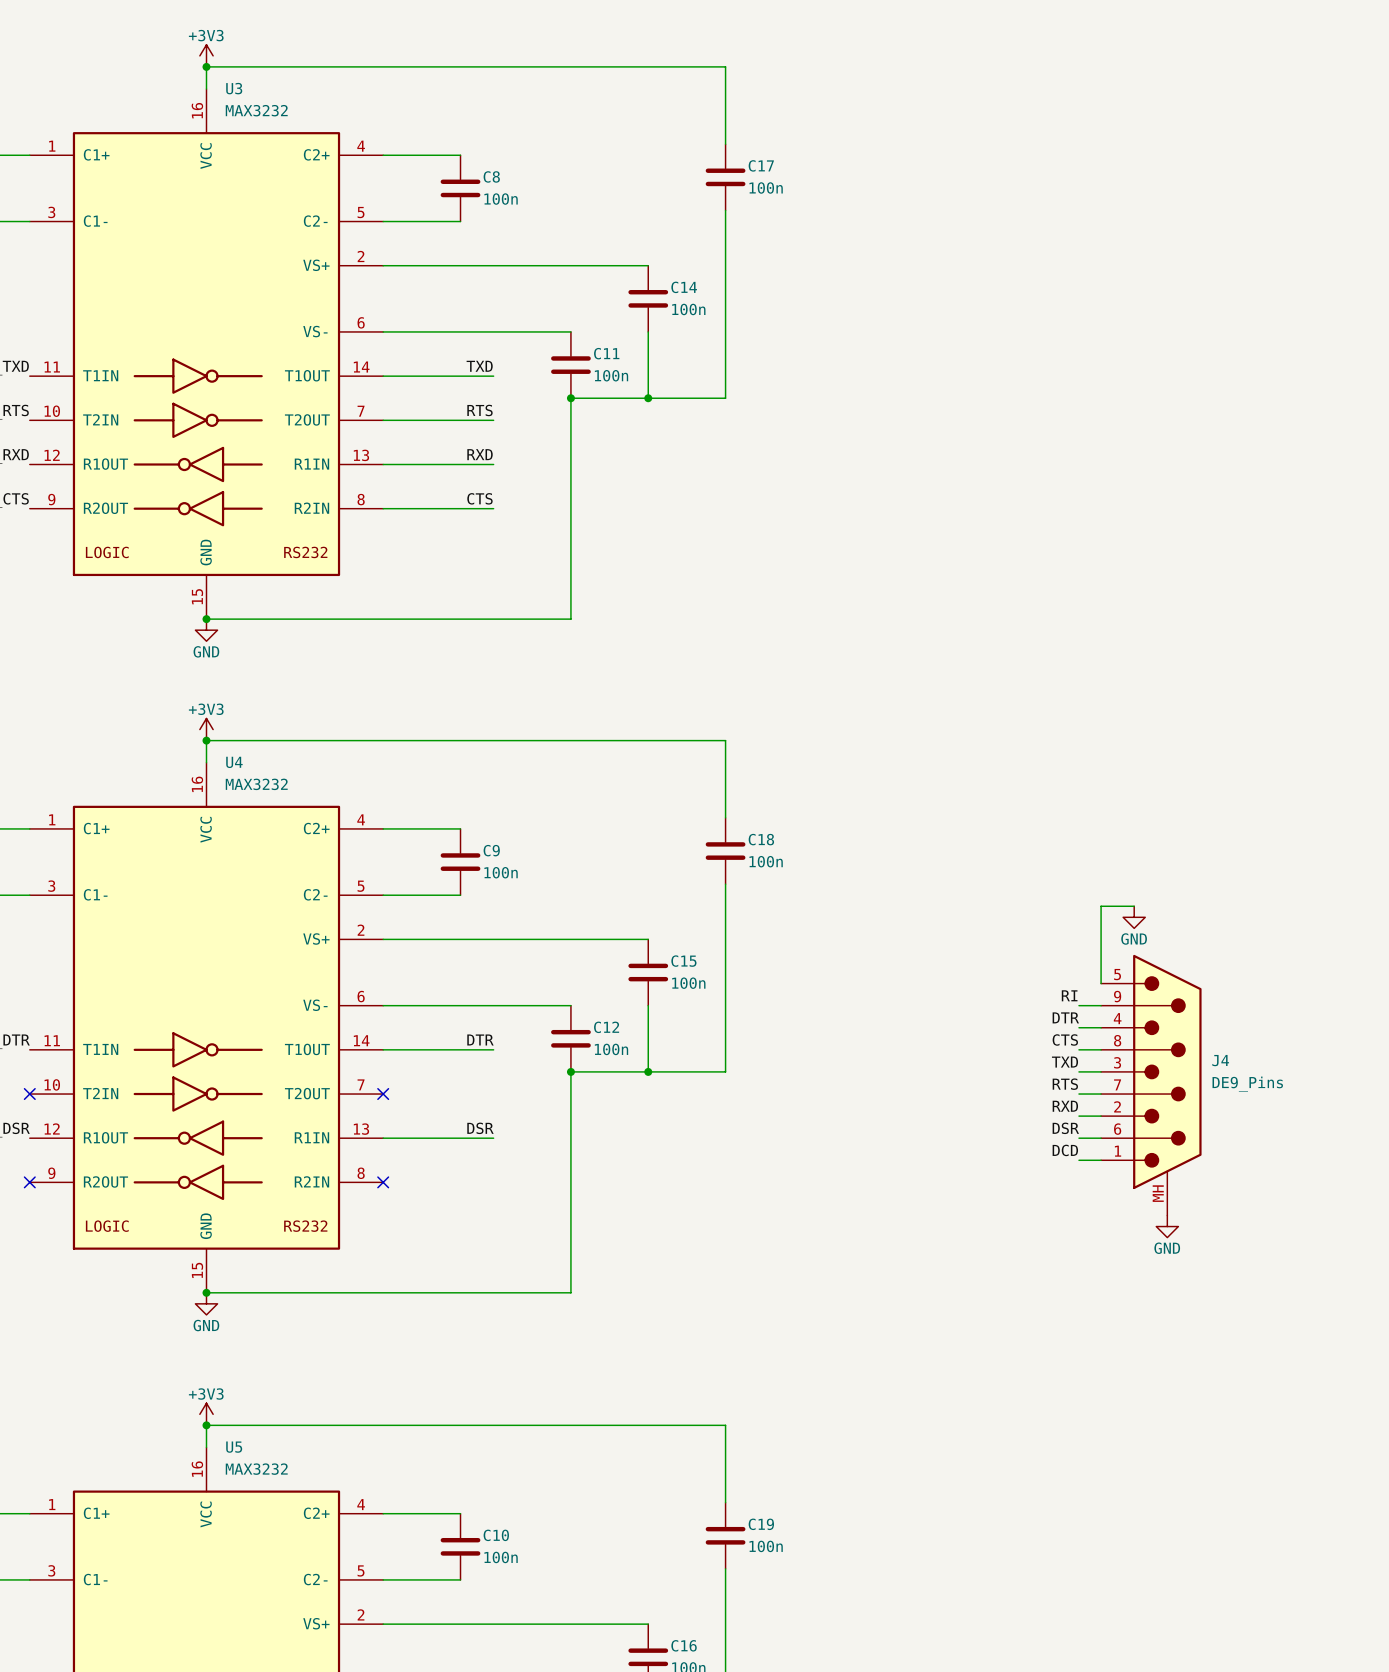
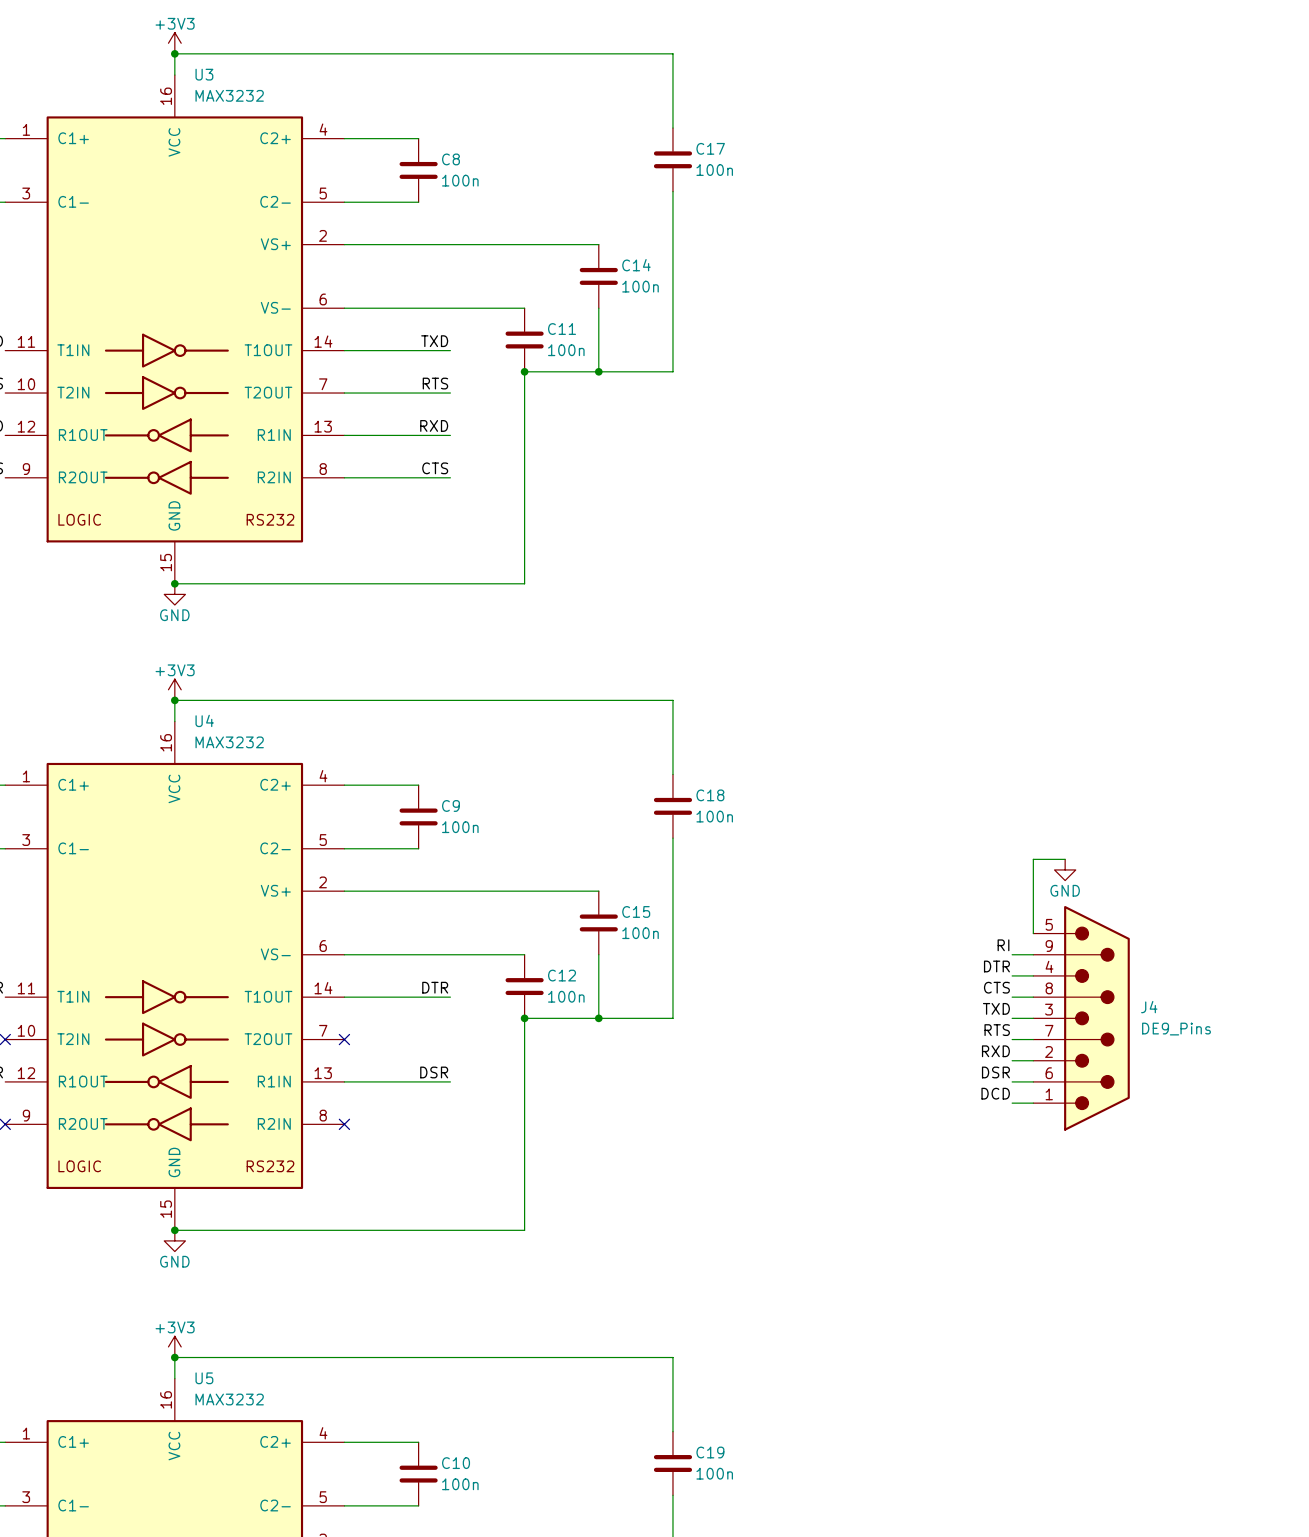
J4 symbol: [1101, 954, 1202, 1216] -> [1033, 906, 1130, 1131]
power symbol: GND (1167, 1226) -> none

